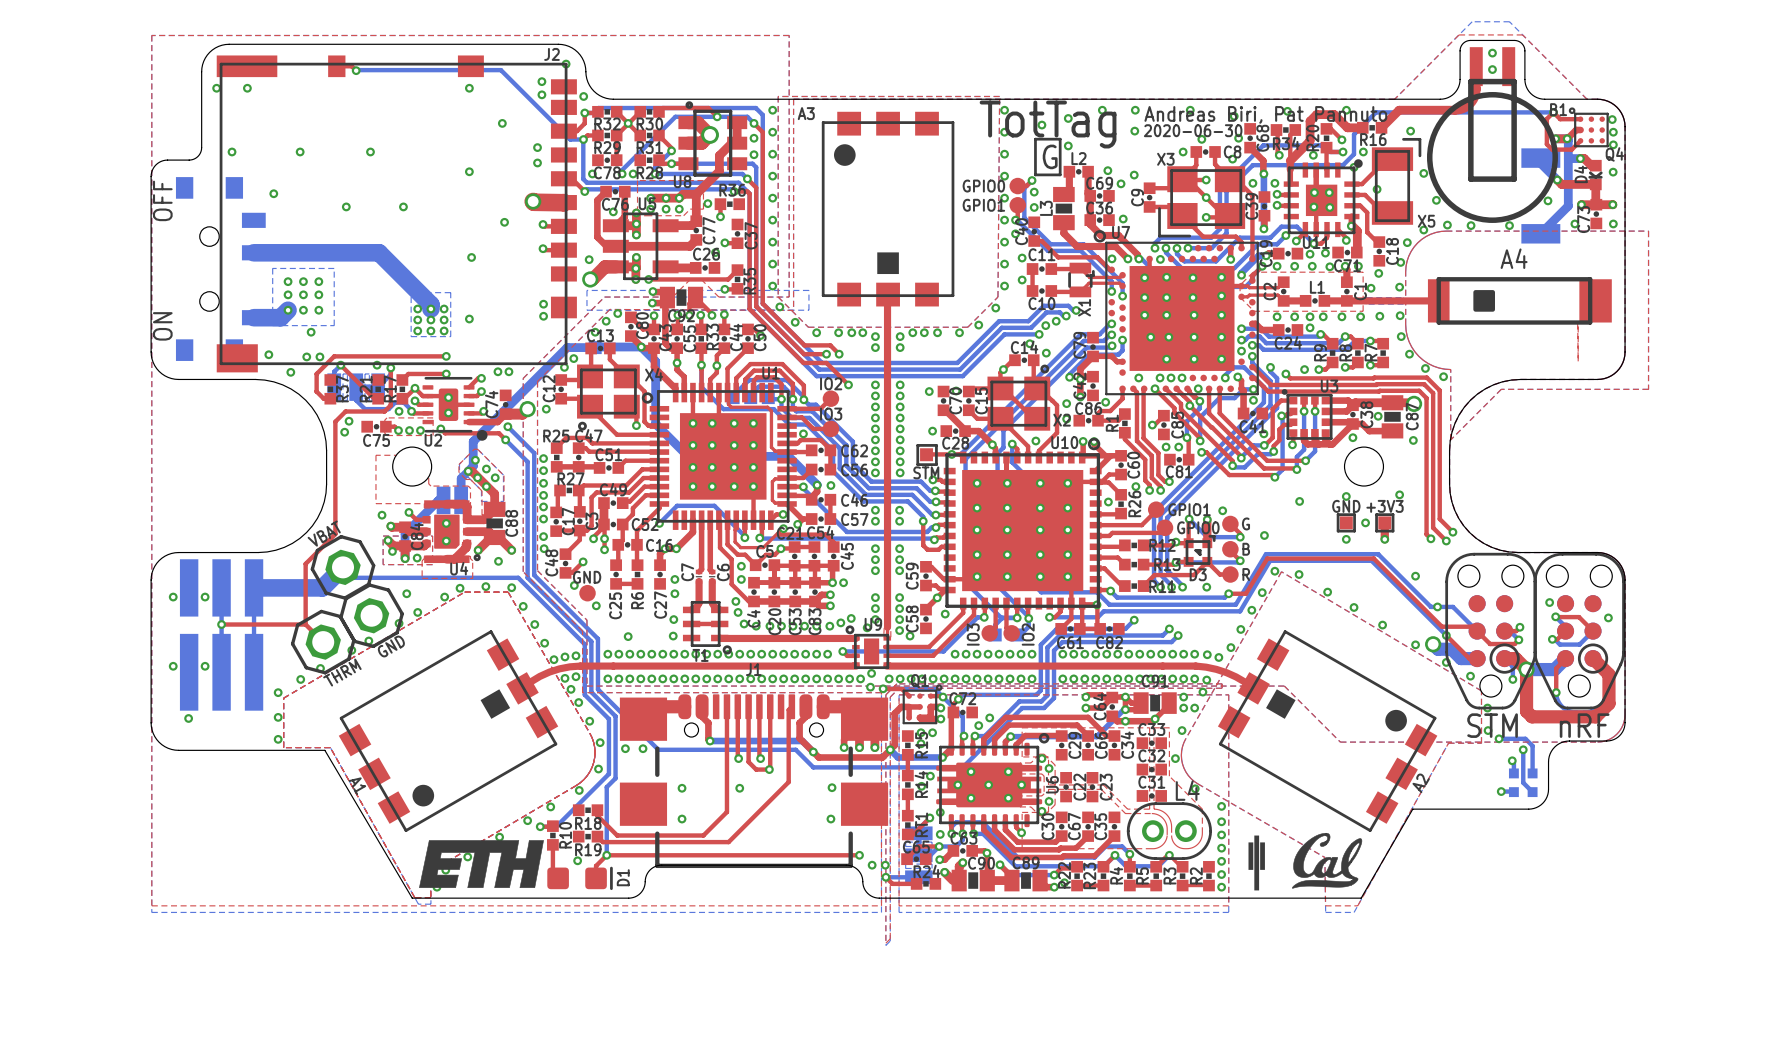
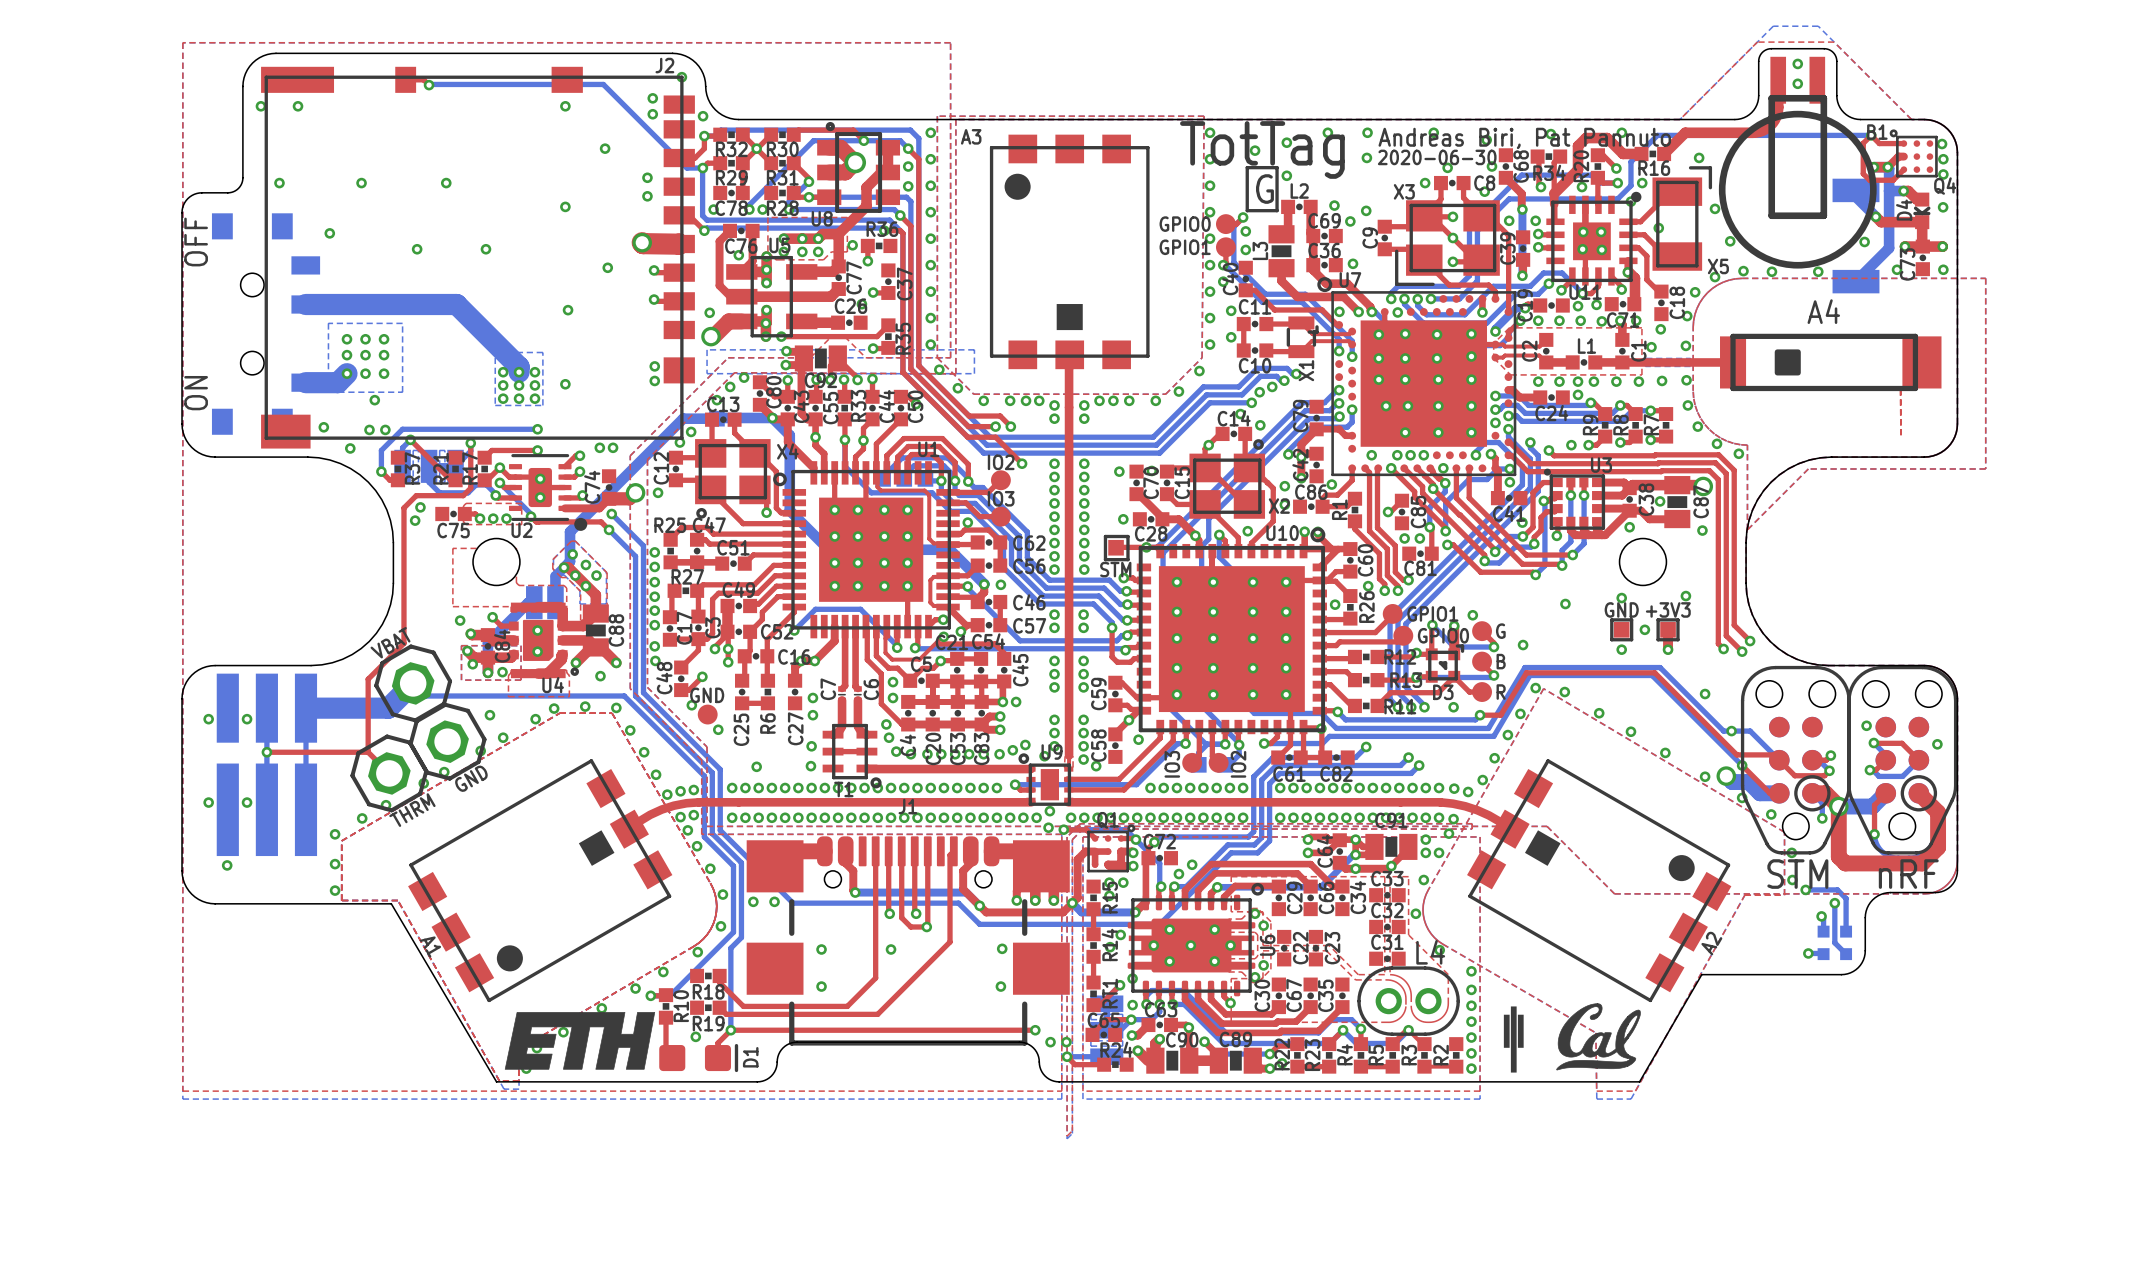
top track: (446, 356) (334, 356) (316, 373) (316, 391) -> none
bottom track: none -> (537, 429) (402, 429) (381, 450) (381, 471)
via: (377, 365) -> none
via: none -> (381, 471)
bottom track: none -> (499, 482) (533, 516)
via: (399, 411) -> none

